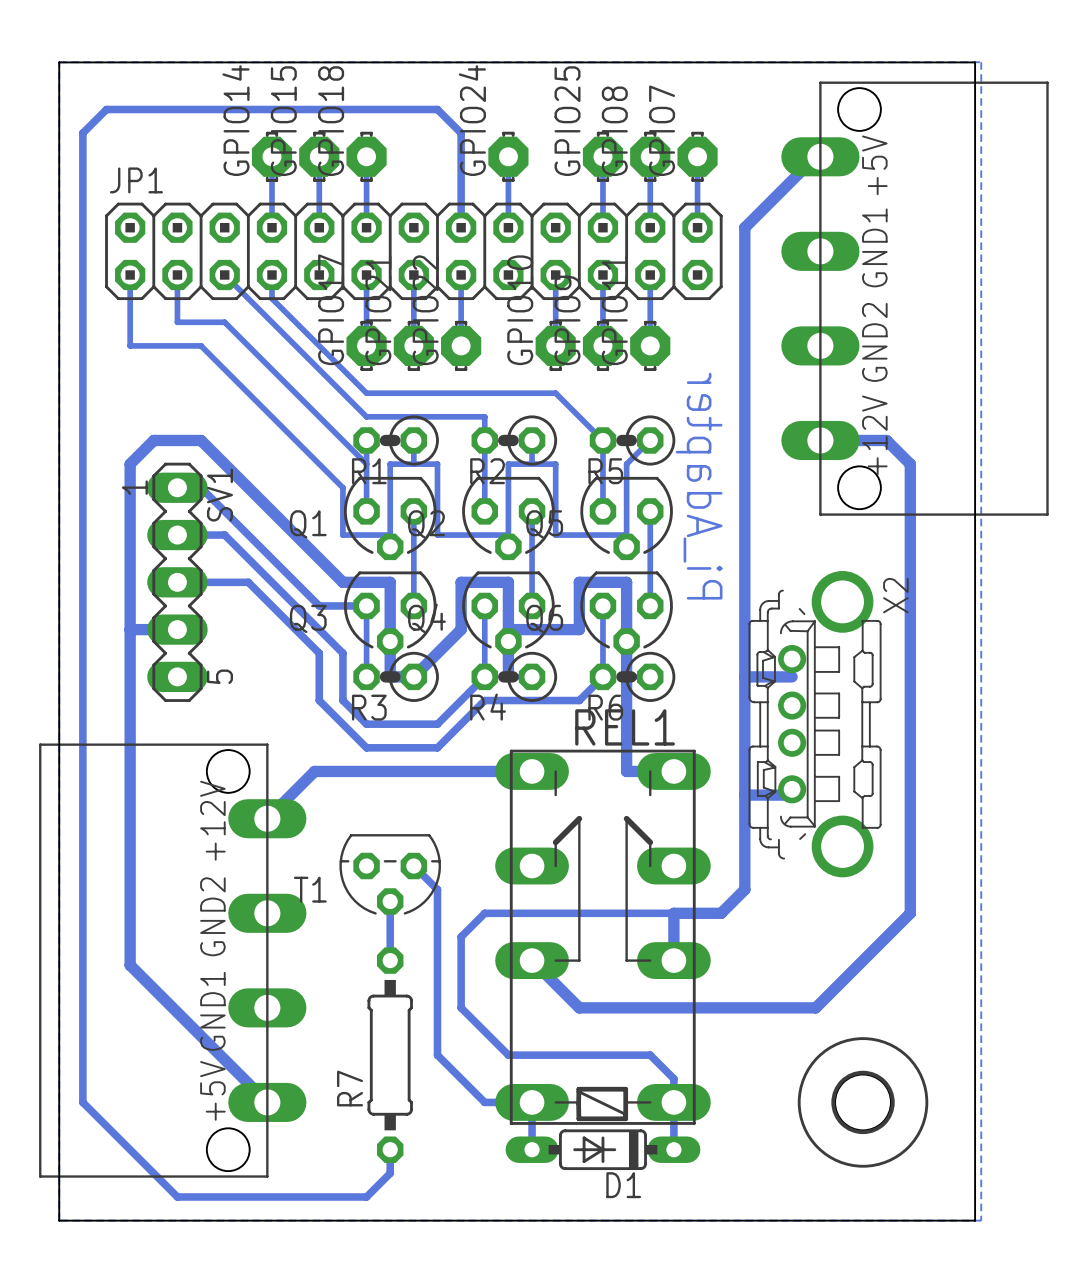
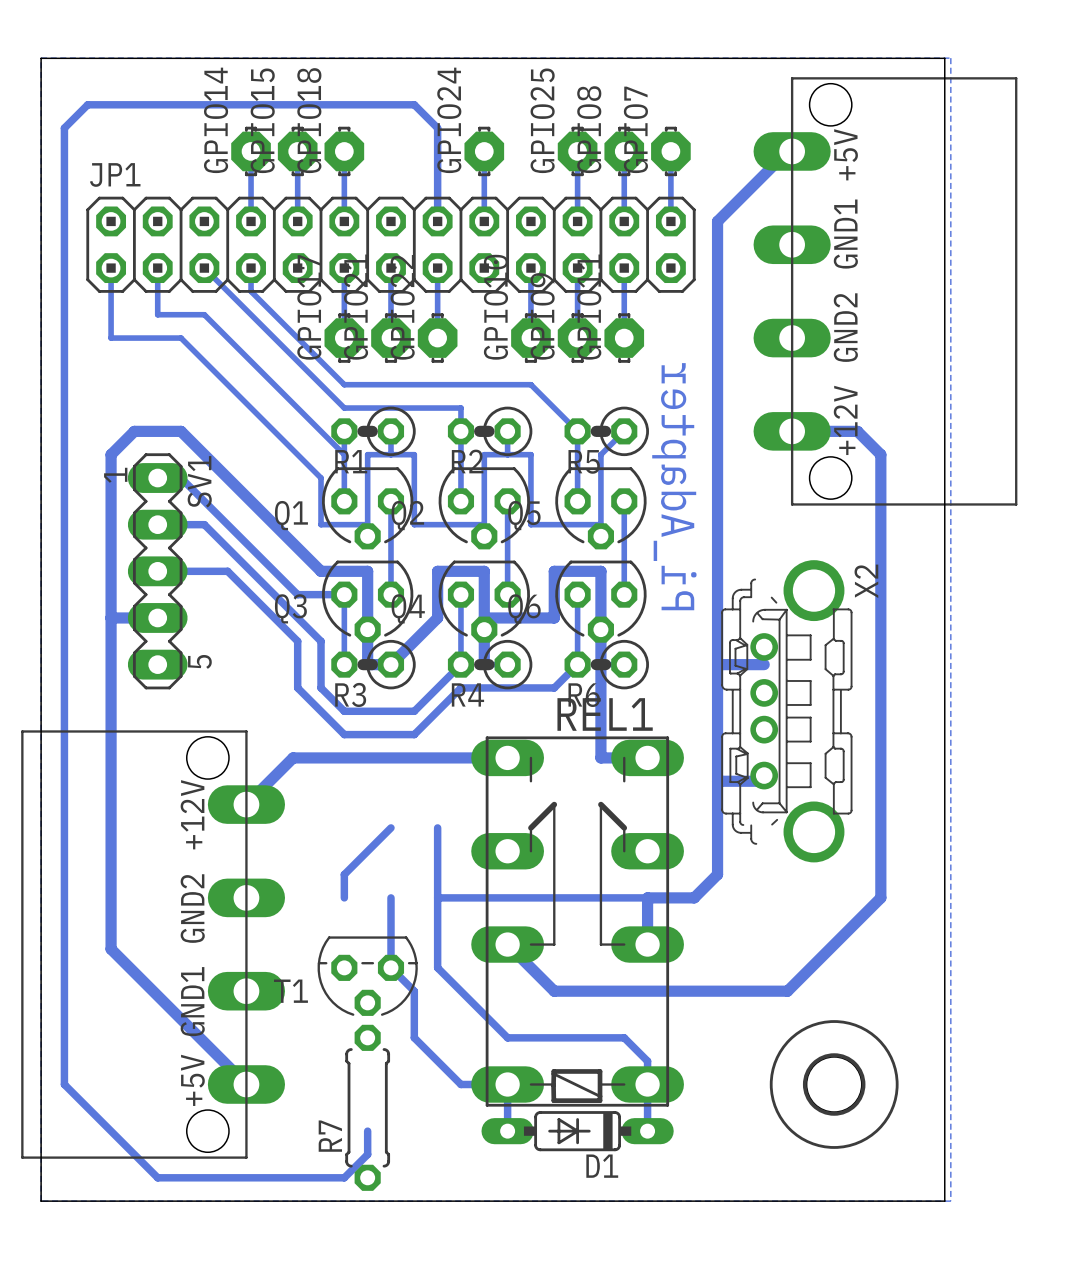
bottom track: none -> (390, 827) (344, 874) (344, 897)
bottom track: none -> (437, 827) (437, 921)
bottom track: (413, 866) (437, 889) (437, 1007) -> (390, 897) (390, 967) (414, 991)
T1 position: (390, 874) -> (367, 976)
bottom track: (390, 901) (390, 960) -> none
bottom track: (484, 913) (461, 936) -> (460, 897) (437, 897)
R7 footprint: [367, 947, 413, 1163] -> [345, 1024, 391, 1191]
bottom track: (461, 984) (461, 1007) (508, 1055) (532, 1055) -> (437, 967) (507, 1037)

